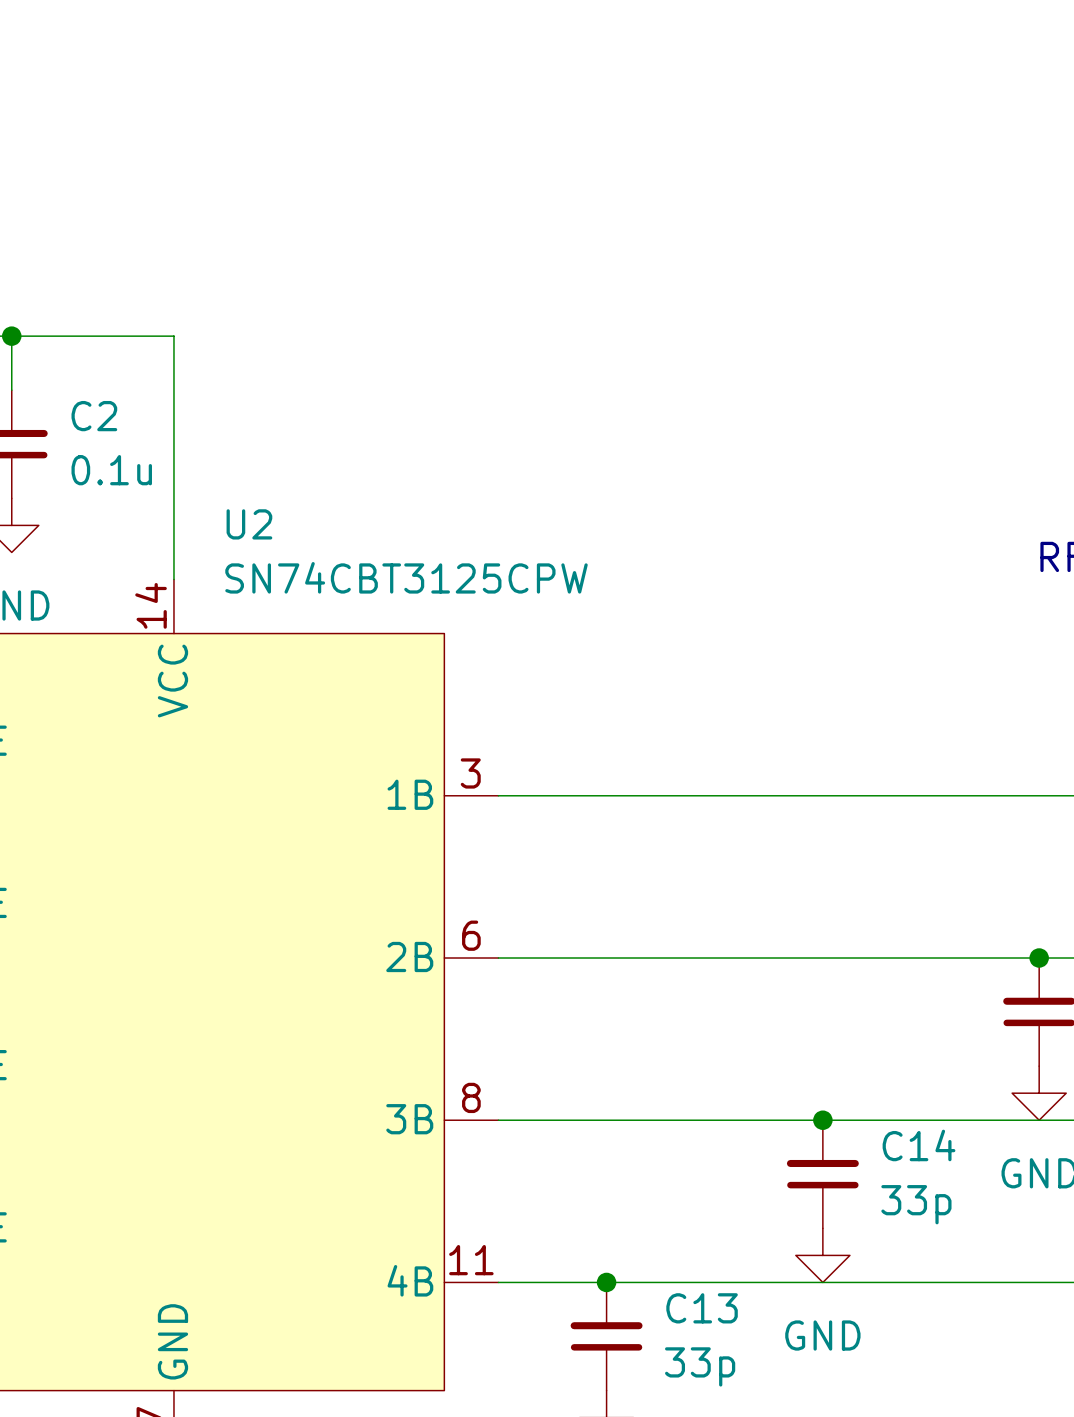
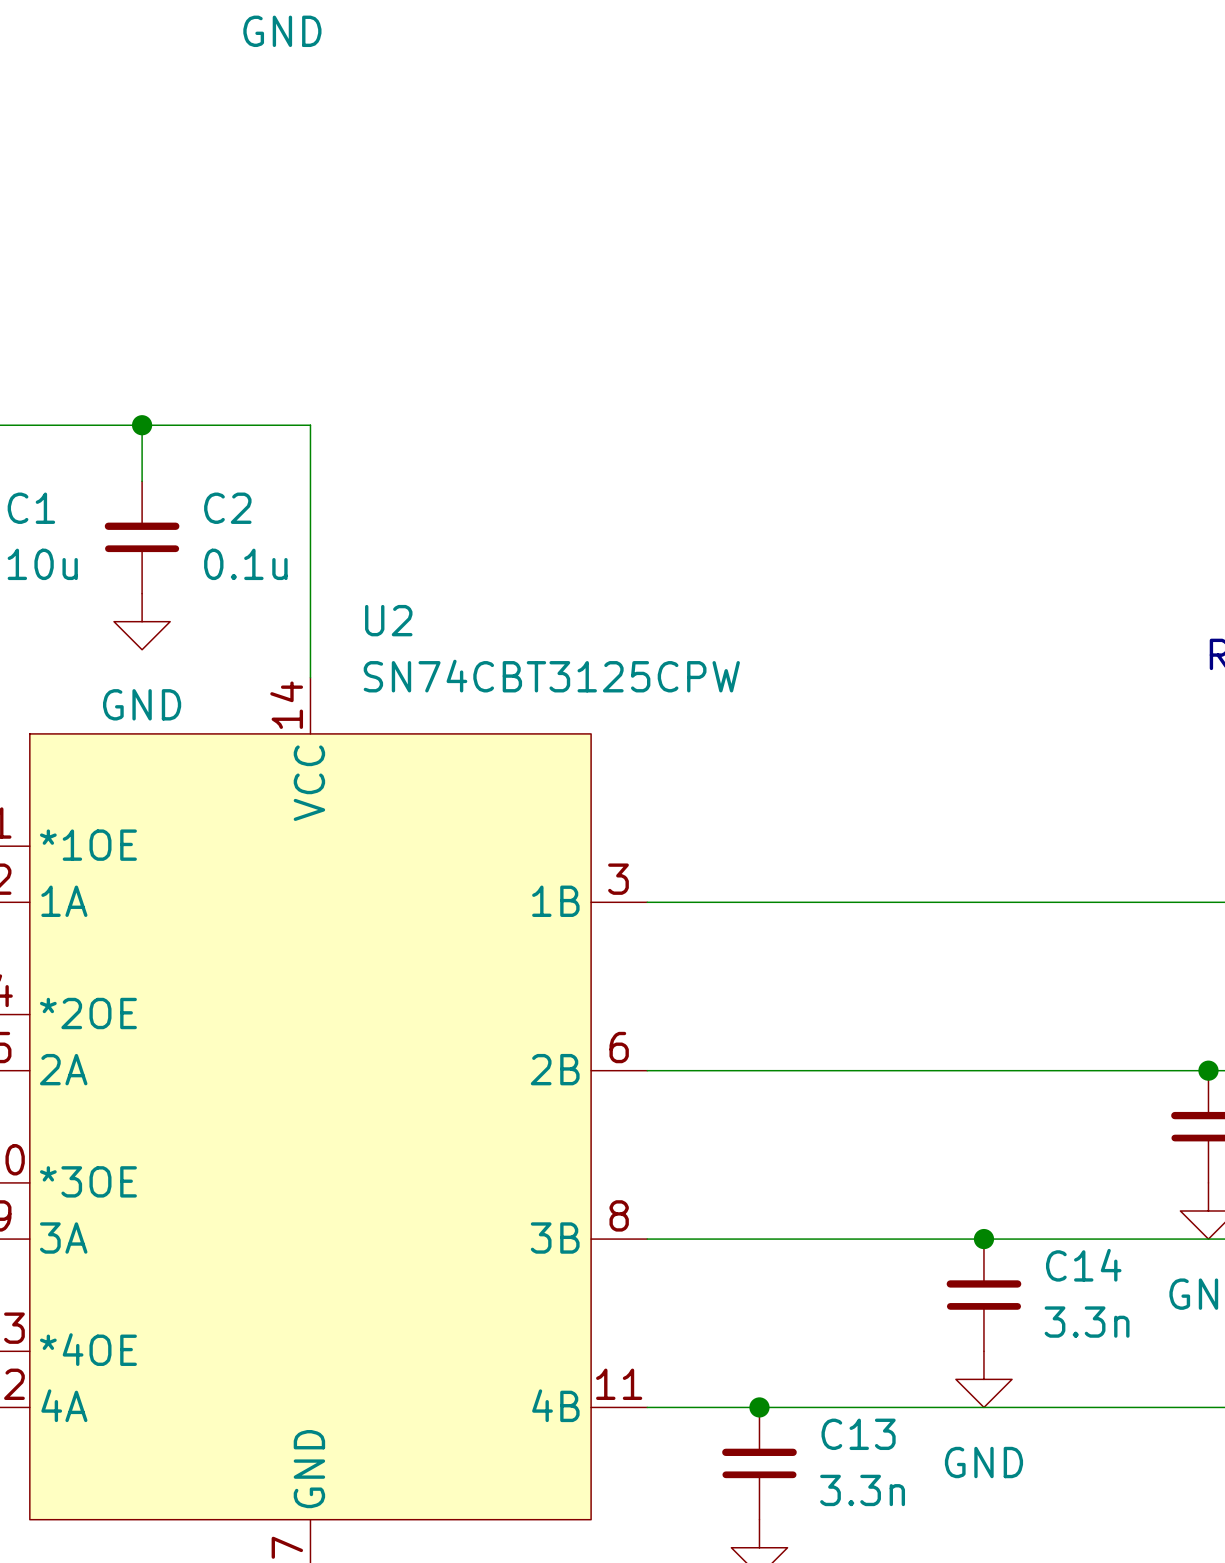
C14 value: 33p (916, 1204) -> 3.3n (1087, 1322)
C13 value: 33p (700, 1366) -> 3.3n (862, 1490)

